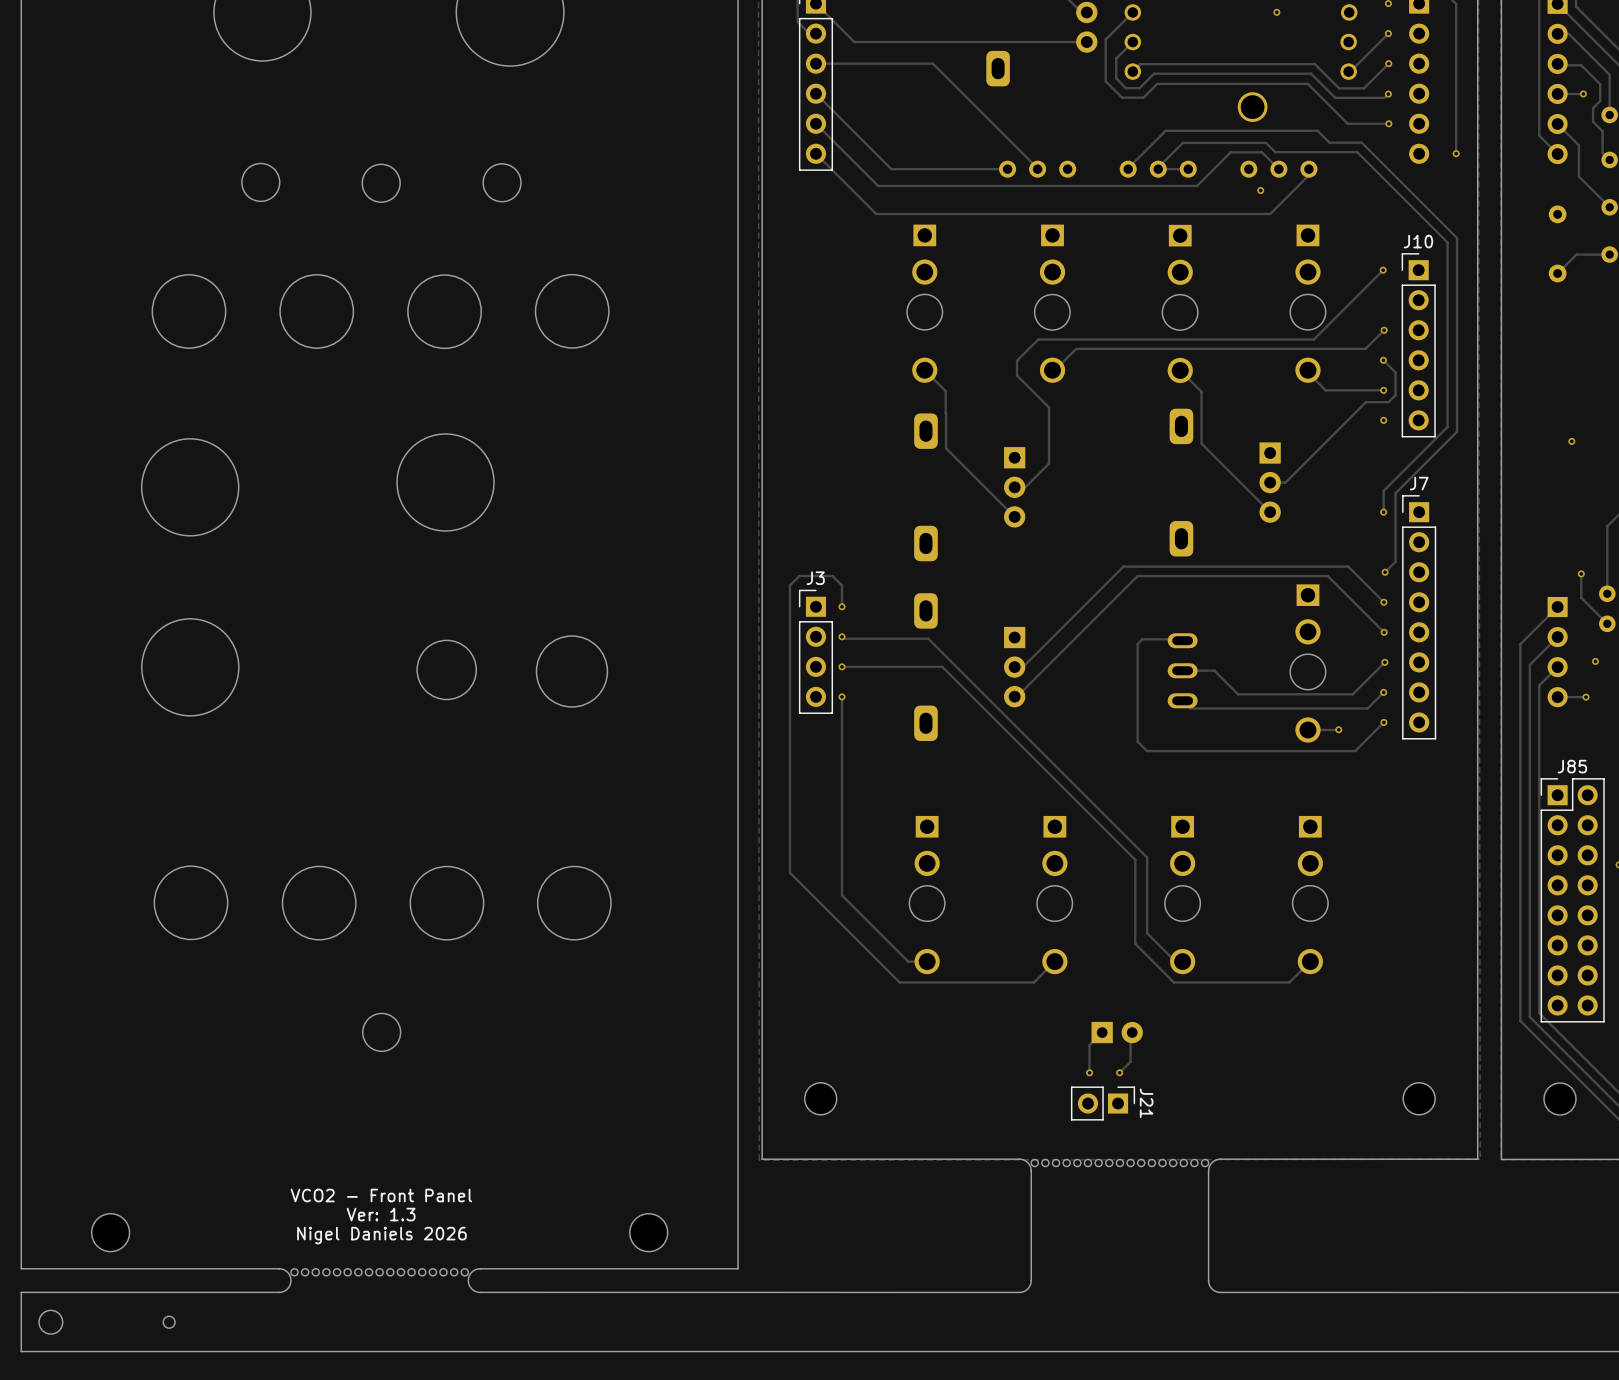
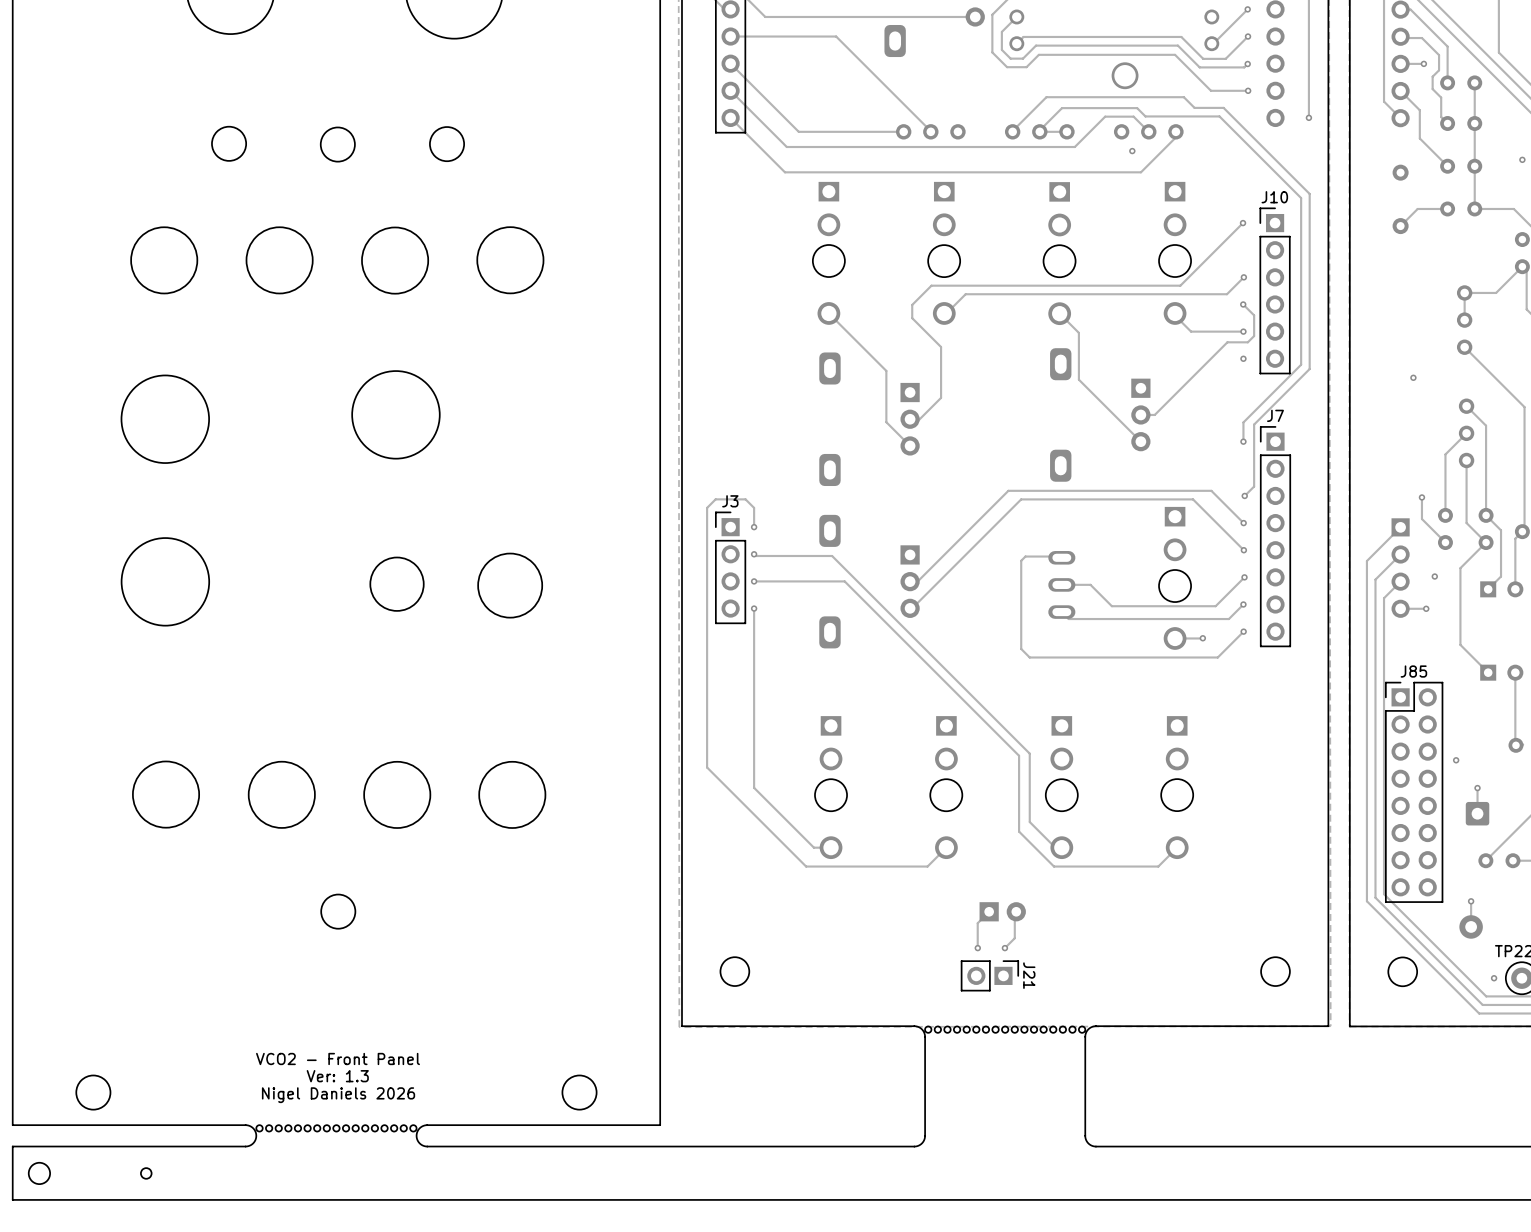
track: (945, 391) (946, 448) (988, 490) -> (847, 332) (886, 370) (886, 422)

